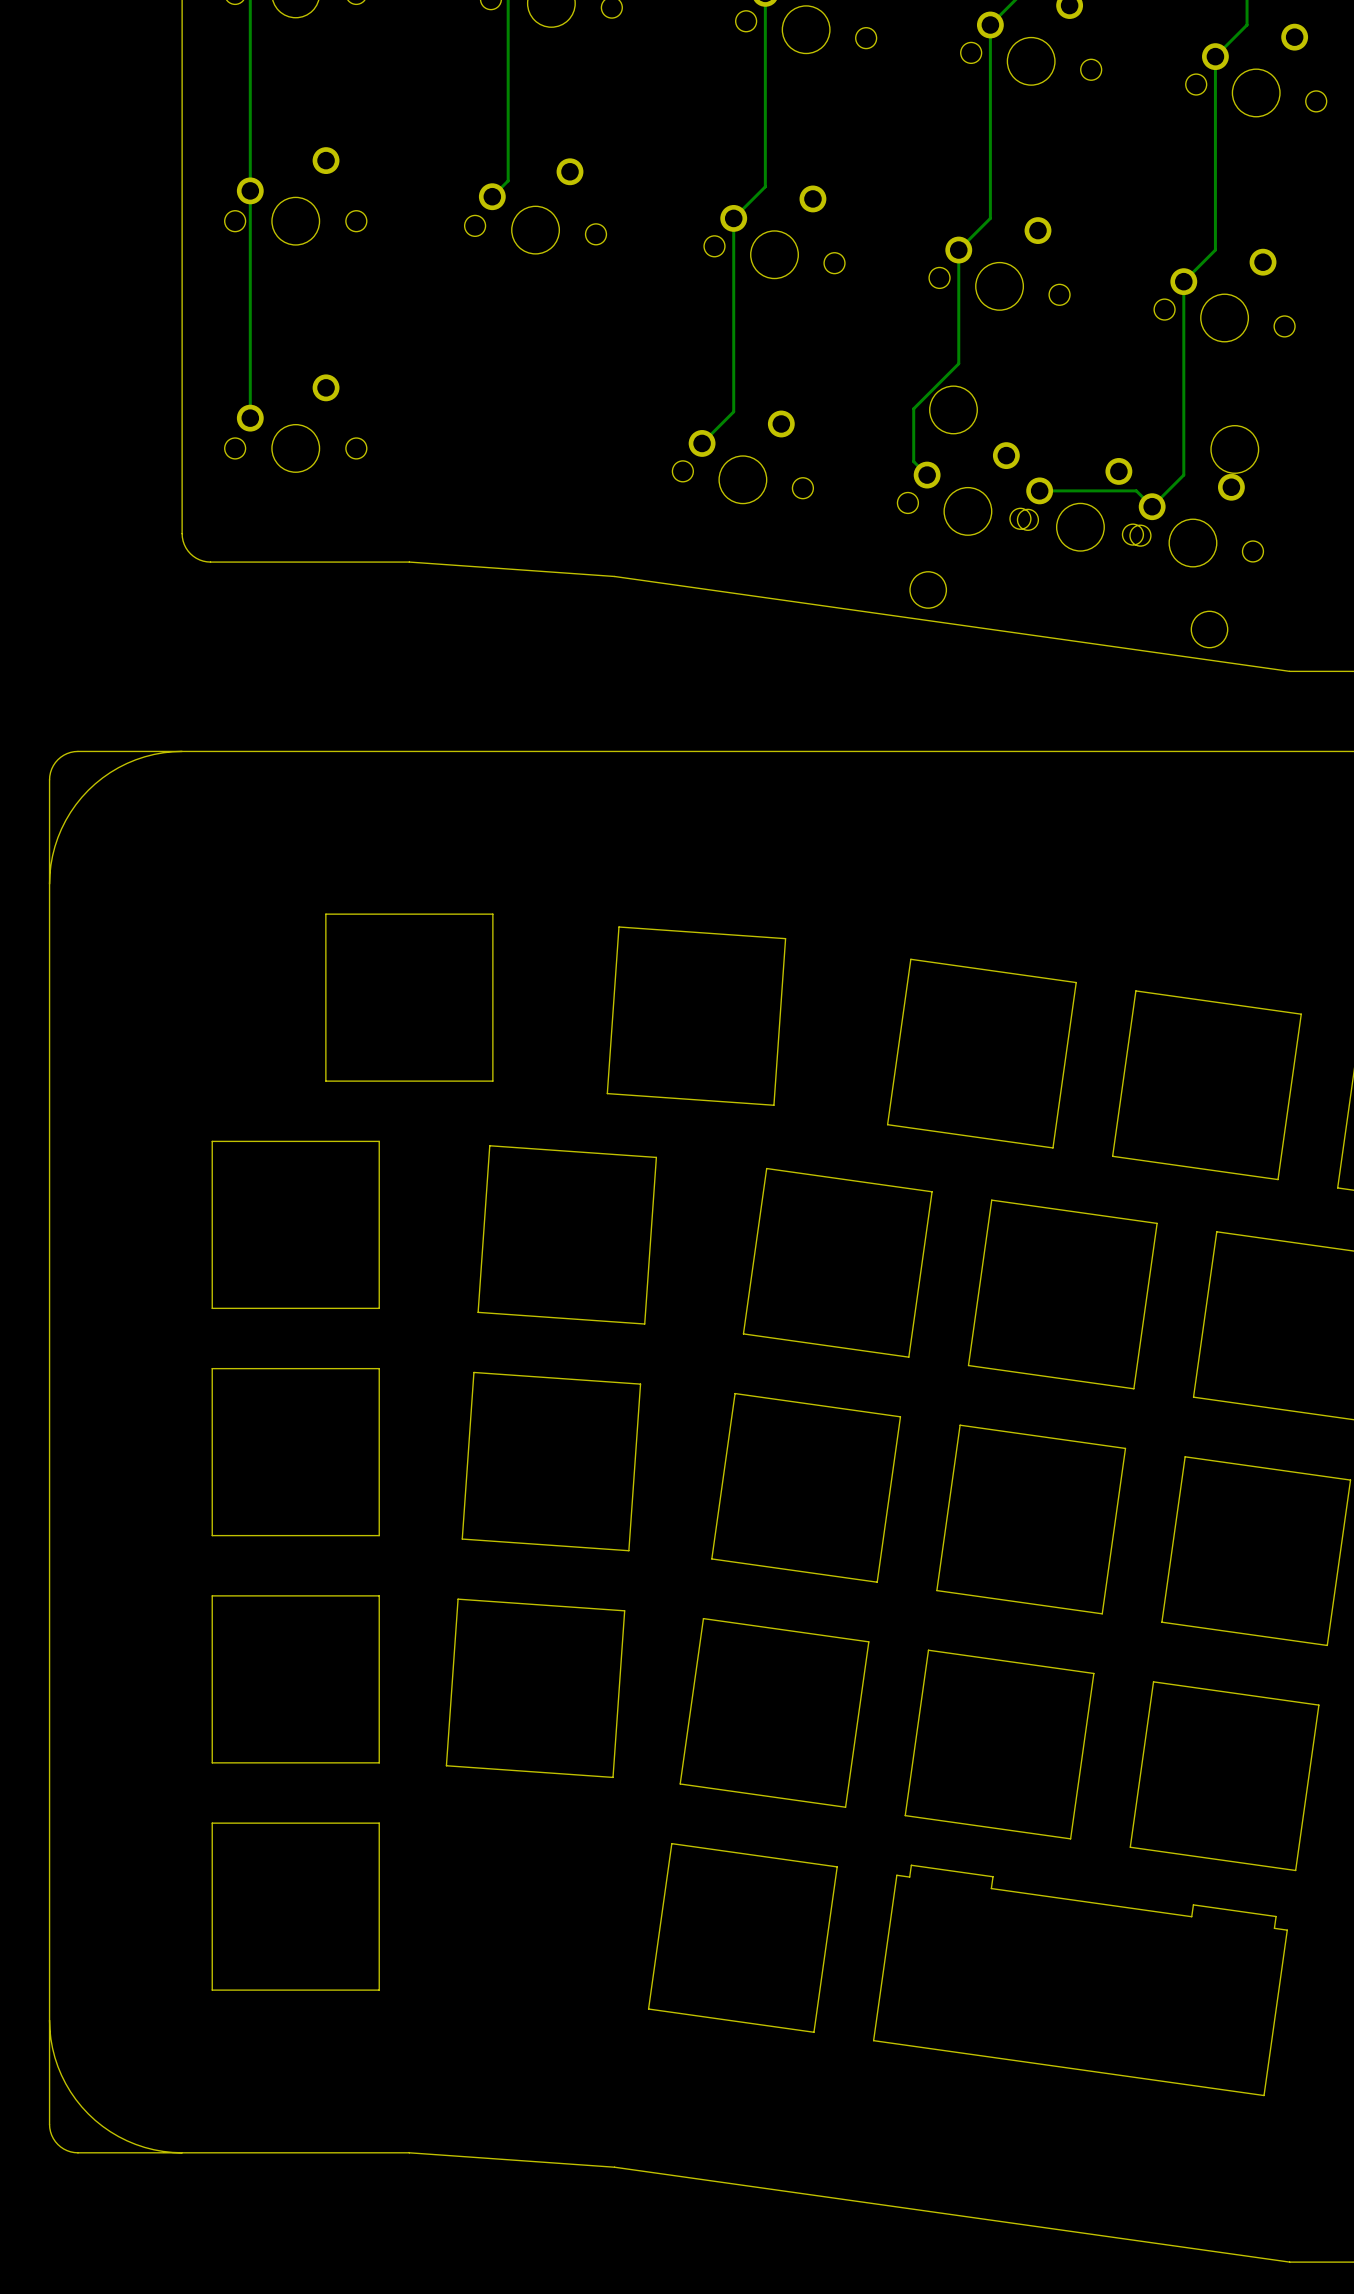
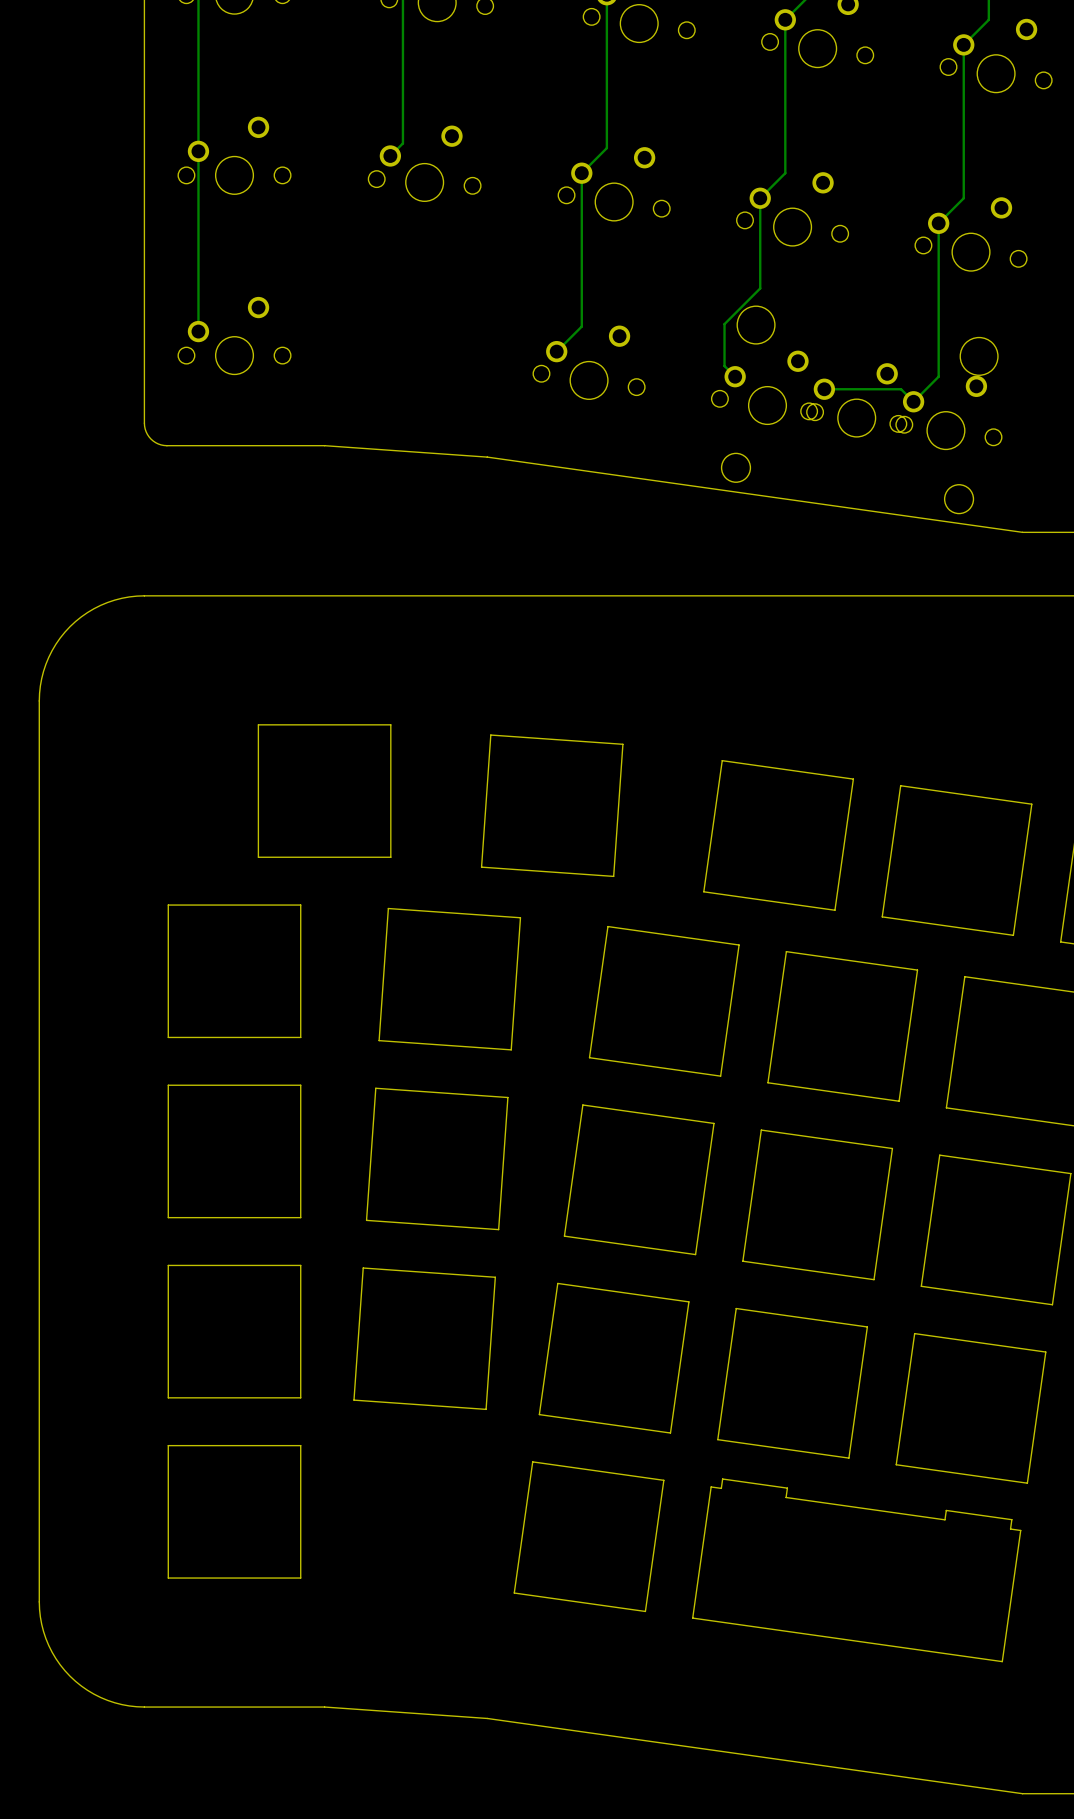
board edge: (182, 751) (74, 751) (57, 759) (49, 776) (49, 884) -> none
board edge: (49, 2020) (49, 2128) (57, 2144) (74, 2152) (182, 2152) -> none

